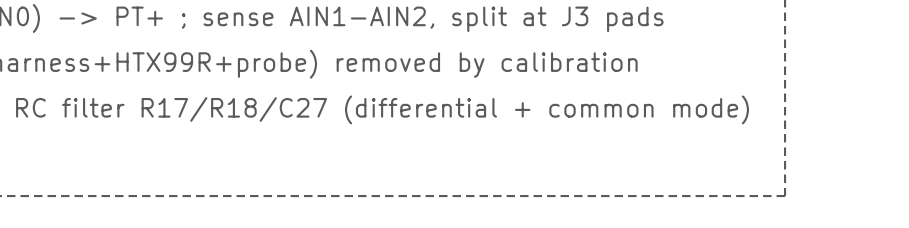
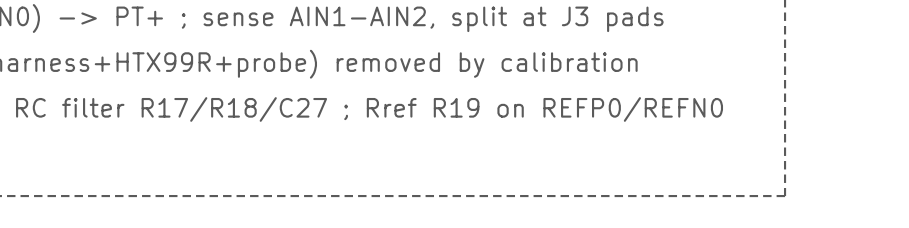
text: RC filter R17/R18/C27 (differential + common mode) (382, 109) -> RC filter R17/R18/C27 ; Rref R19 on REFP0/REFN0 (369, 109)

